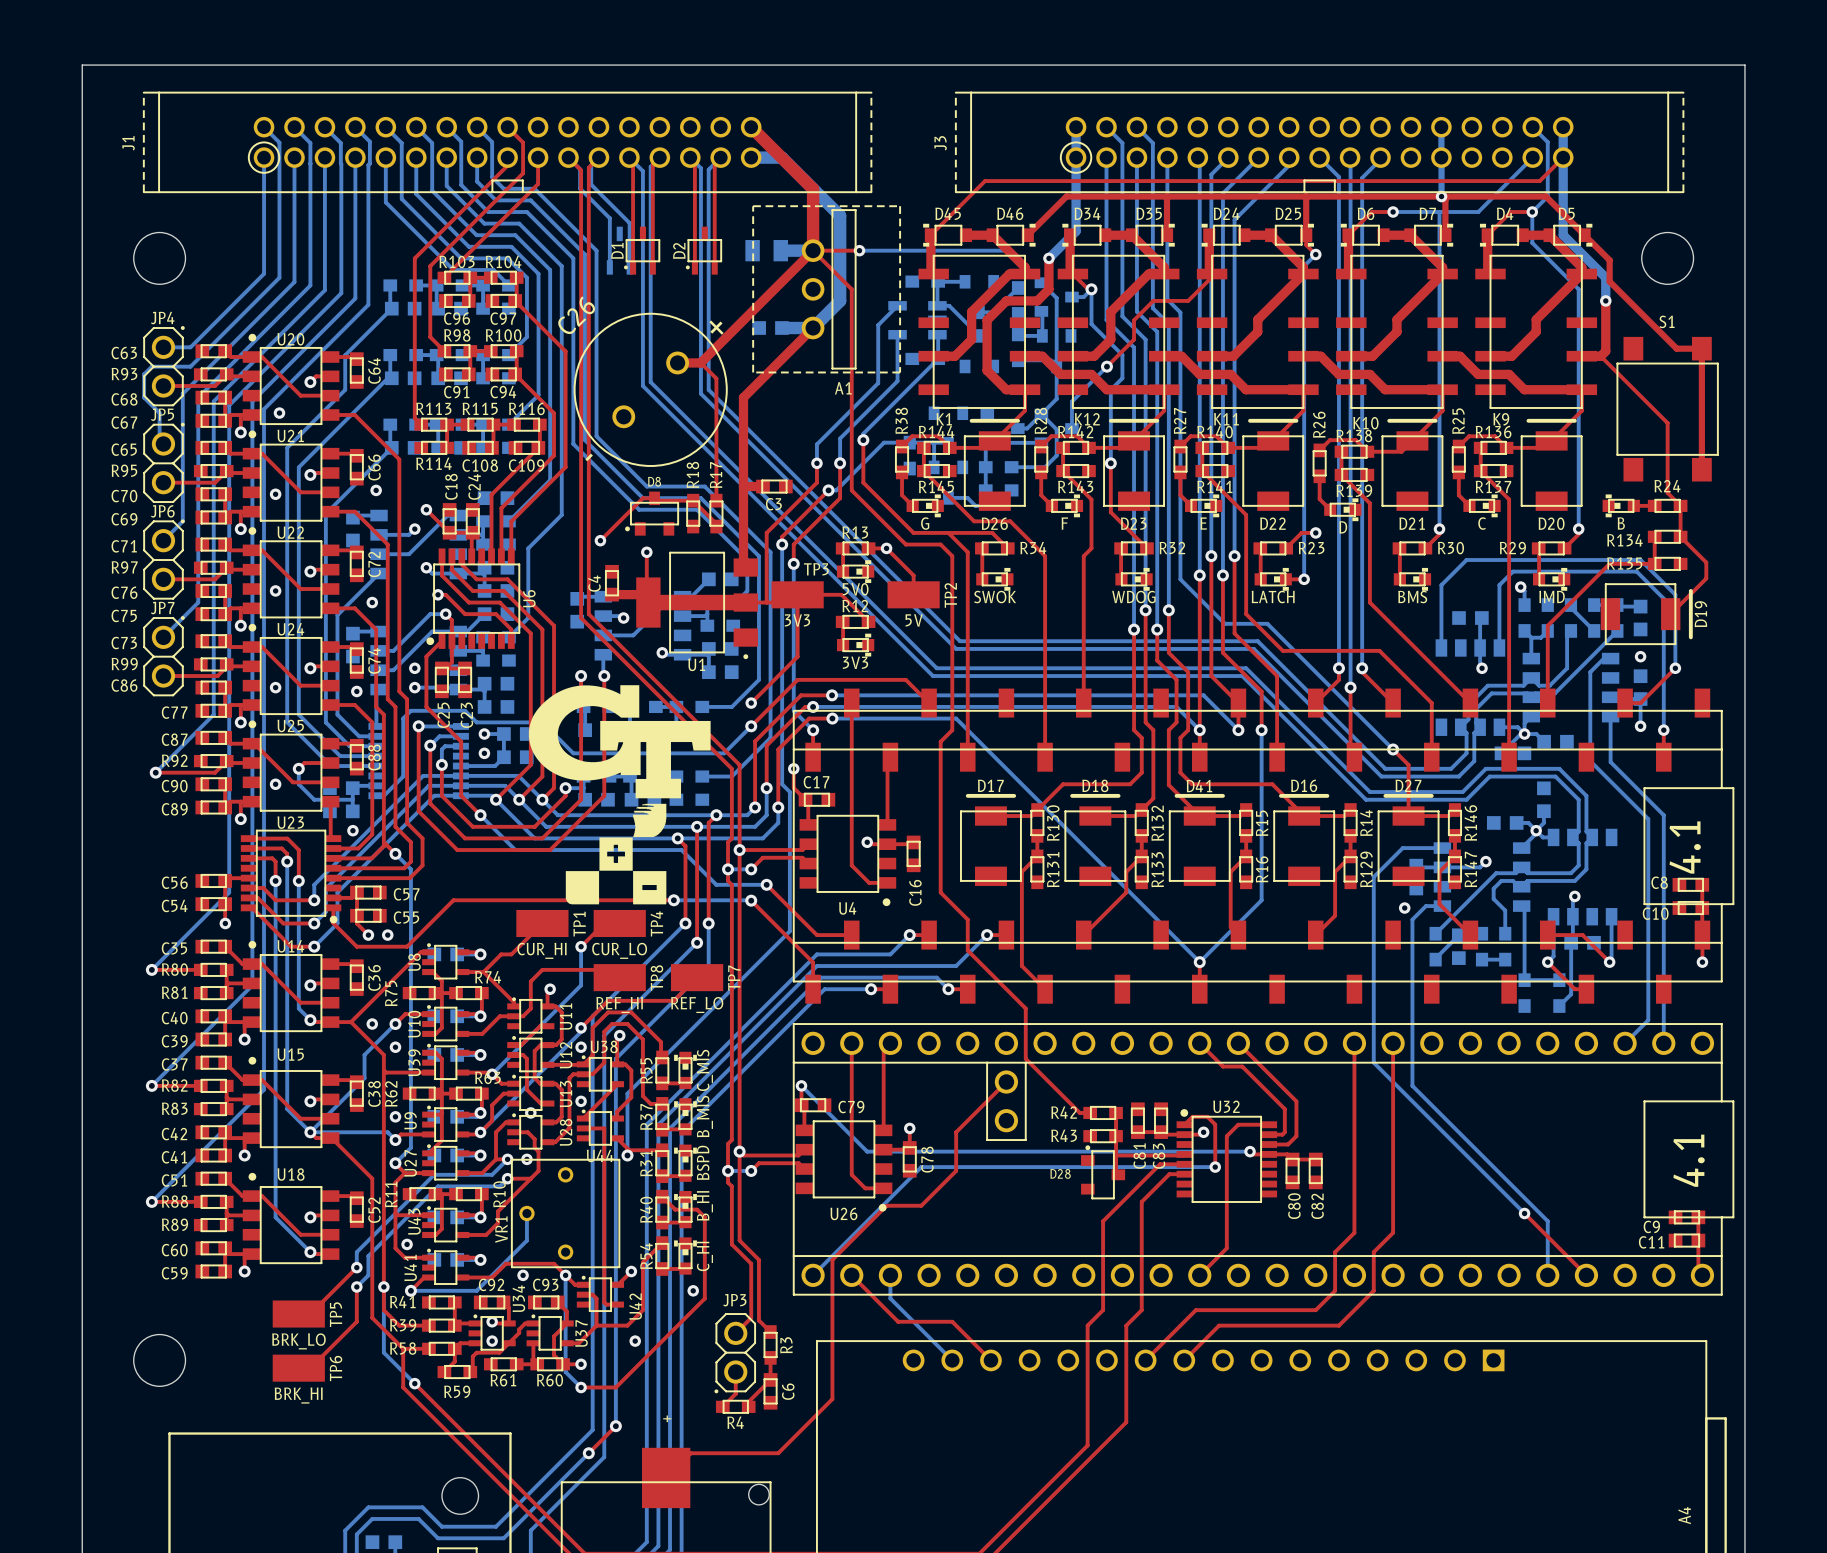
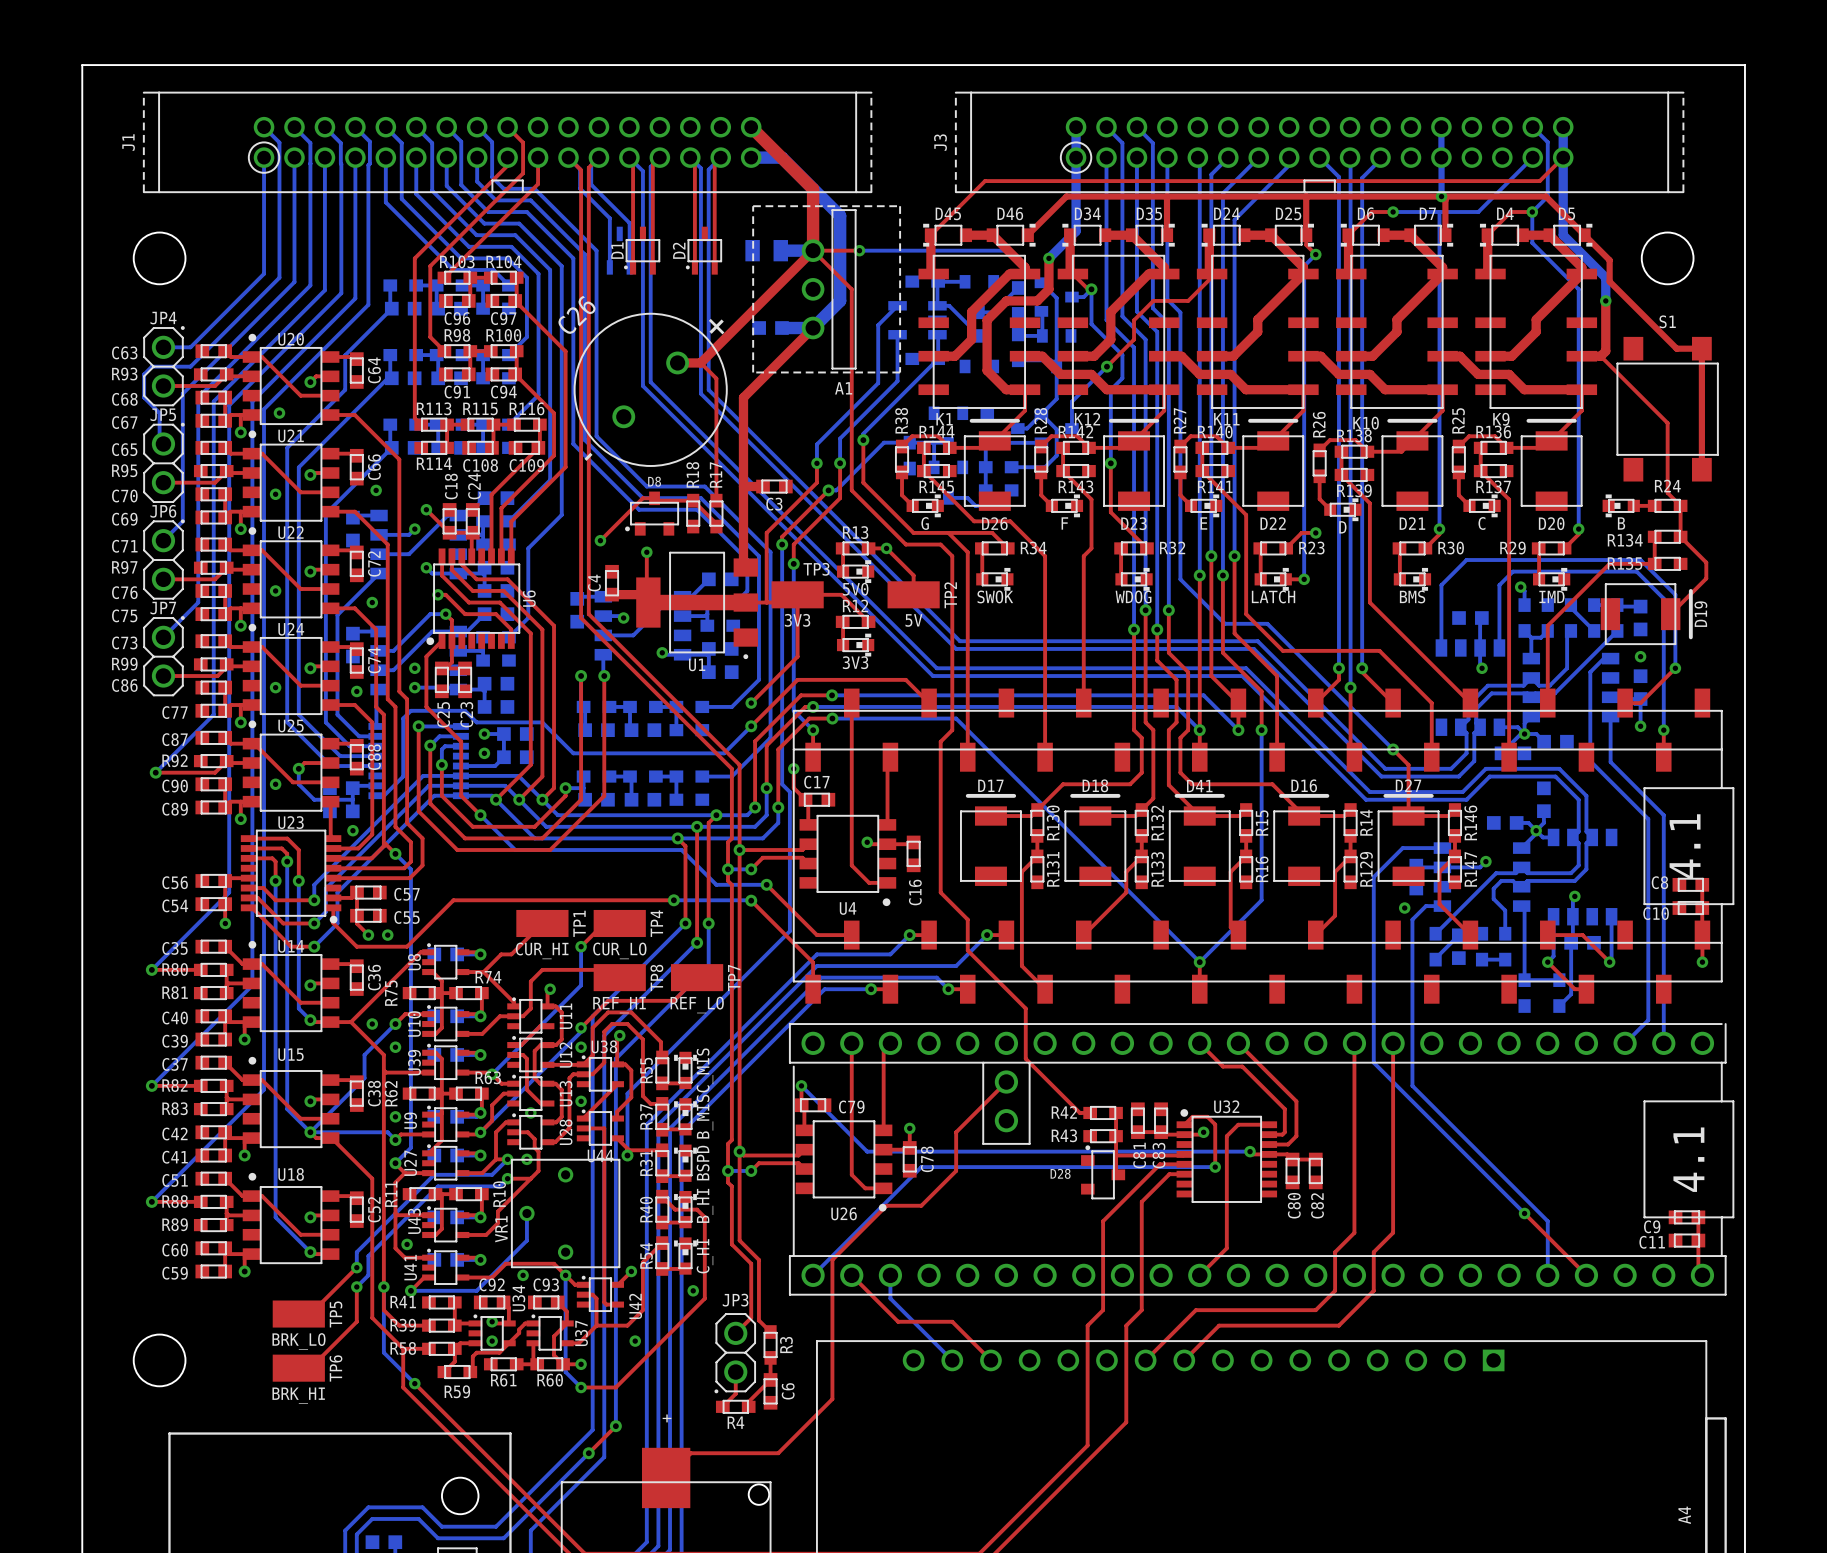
drawing: [528, 685, 711, 905] -> none
part footprint: [792, 1023, 1735, 1296] -> [788, 1023, 1735, 1296]

